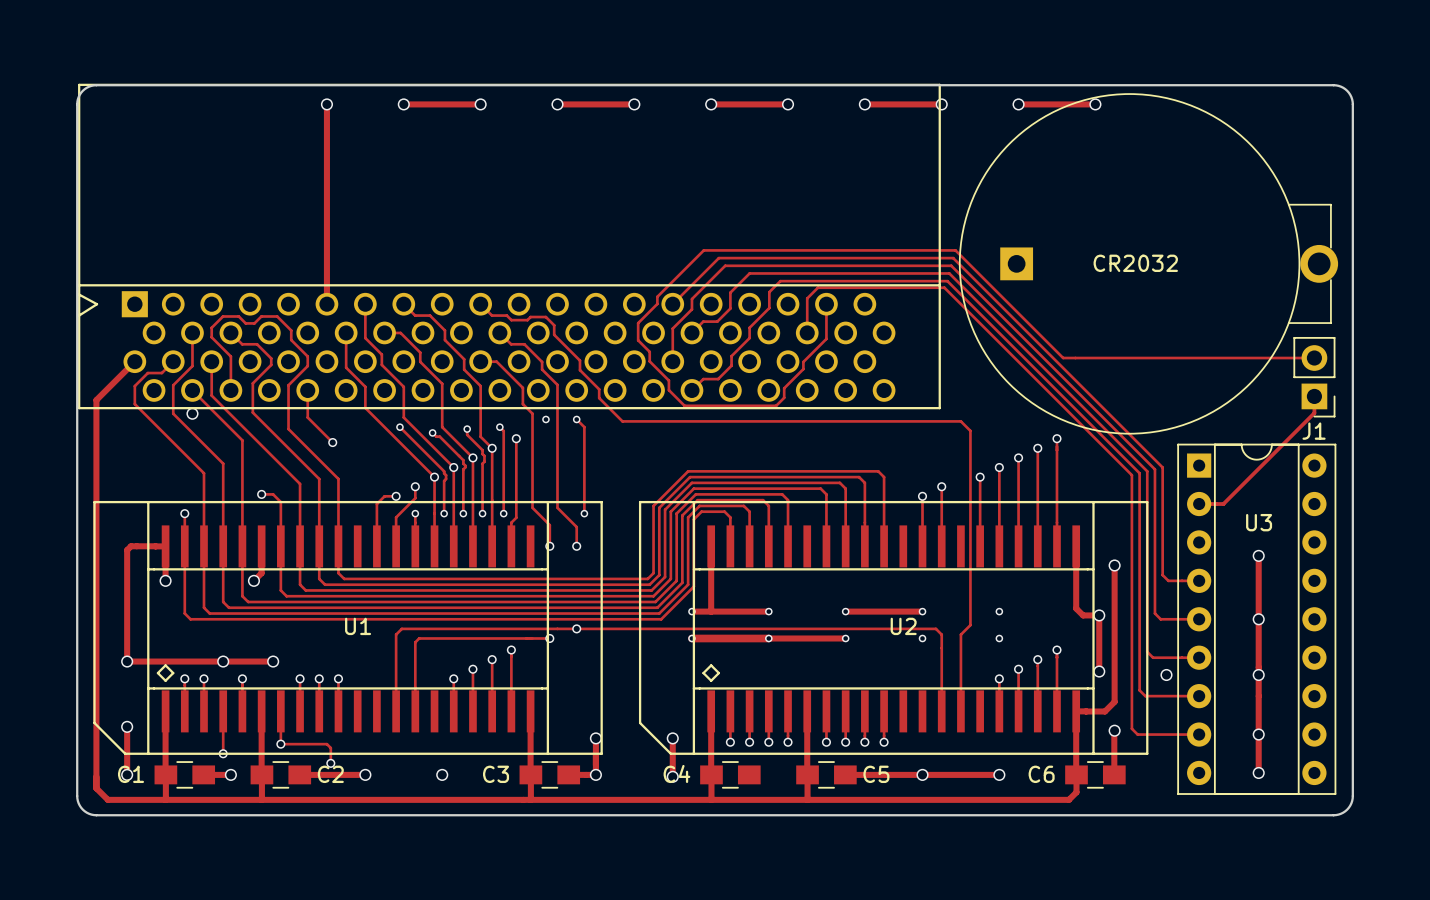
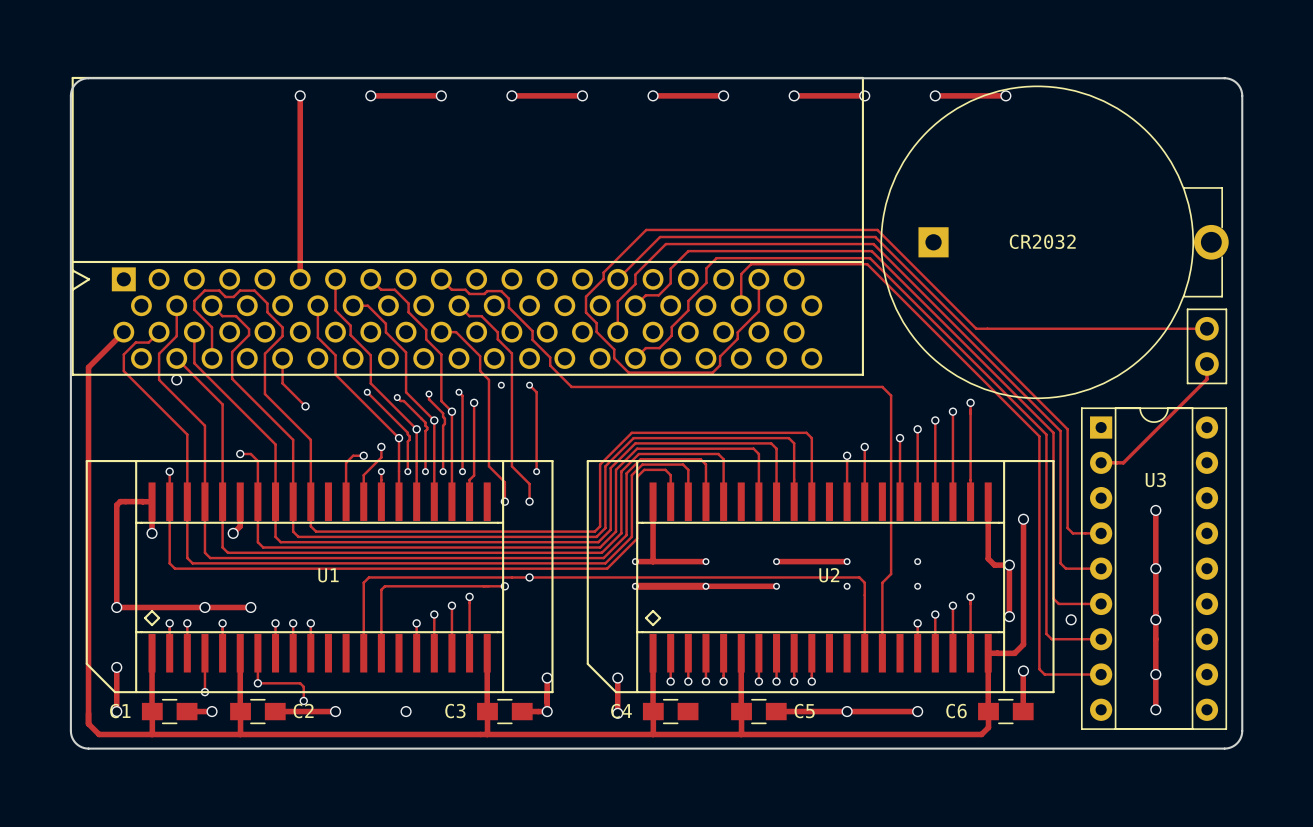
J1: (1314, 377) -> none
part: none -> (1206, 346)

